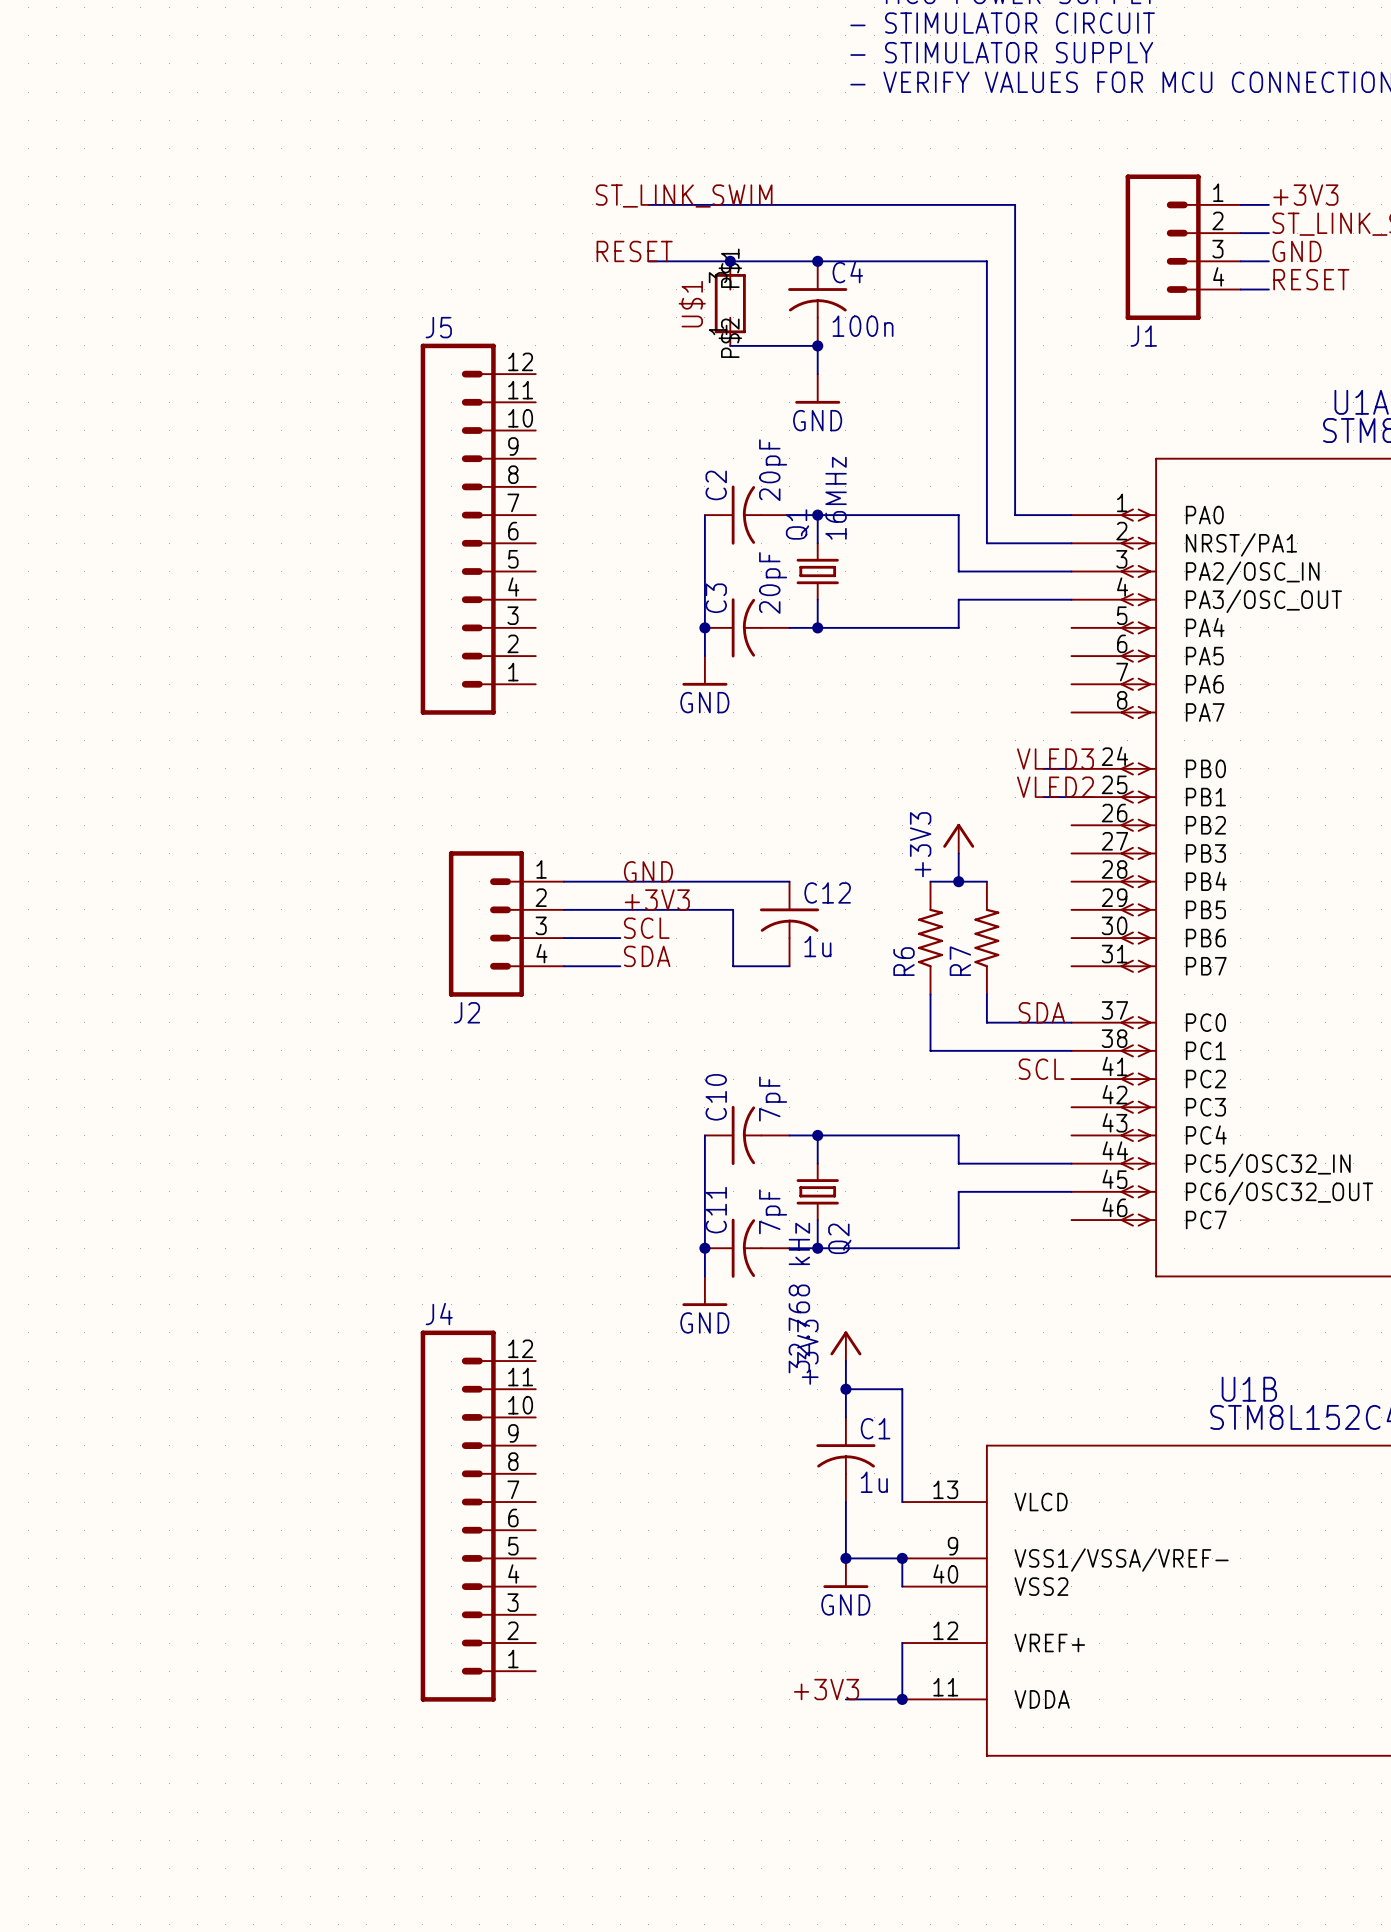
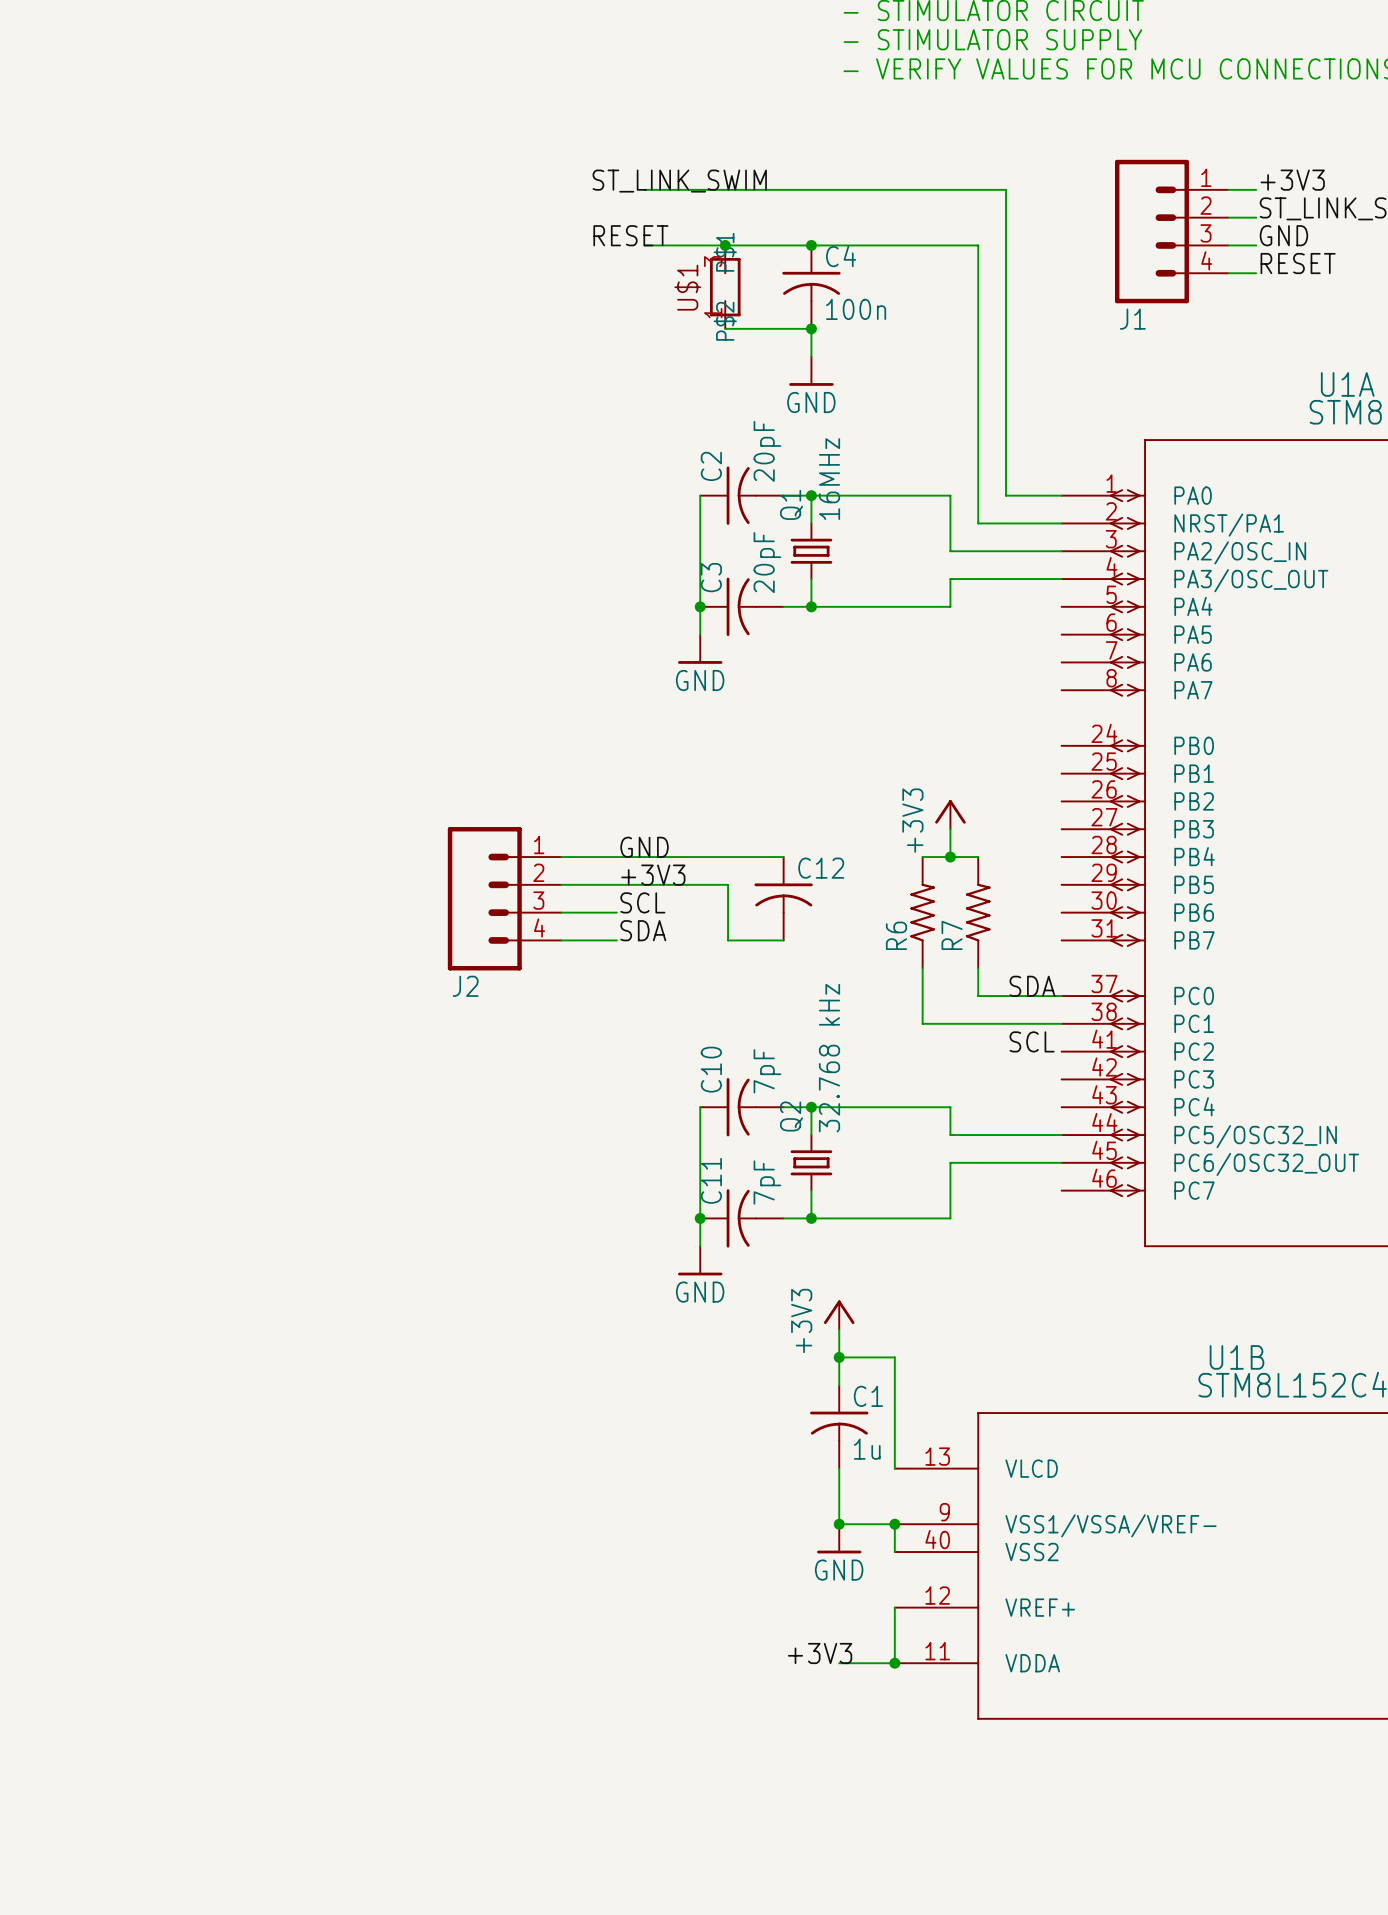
J5: (478, 529) -> none
label: VLED3 (1055, 759) -> none
wire: (1043, 768) (1071, 768) -> none
label: VLED2 (1055, 787) -> none
wire: (1043, 797) (1071, 797) -> none
C12 value: 1u (817, 946) -> none
Q2 name position: Q2 (839, 1238) -> Q2 (791, 1116)
Q2 value position: 32.768 kHz (799, 1298) -> 32.768 kHz (829, 1058)
J4: (478, 1516) -> none

